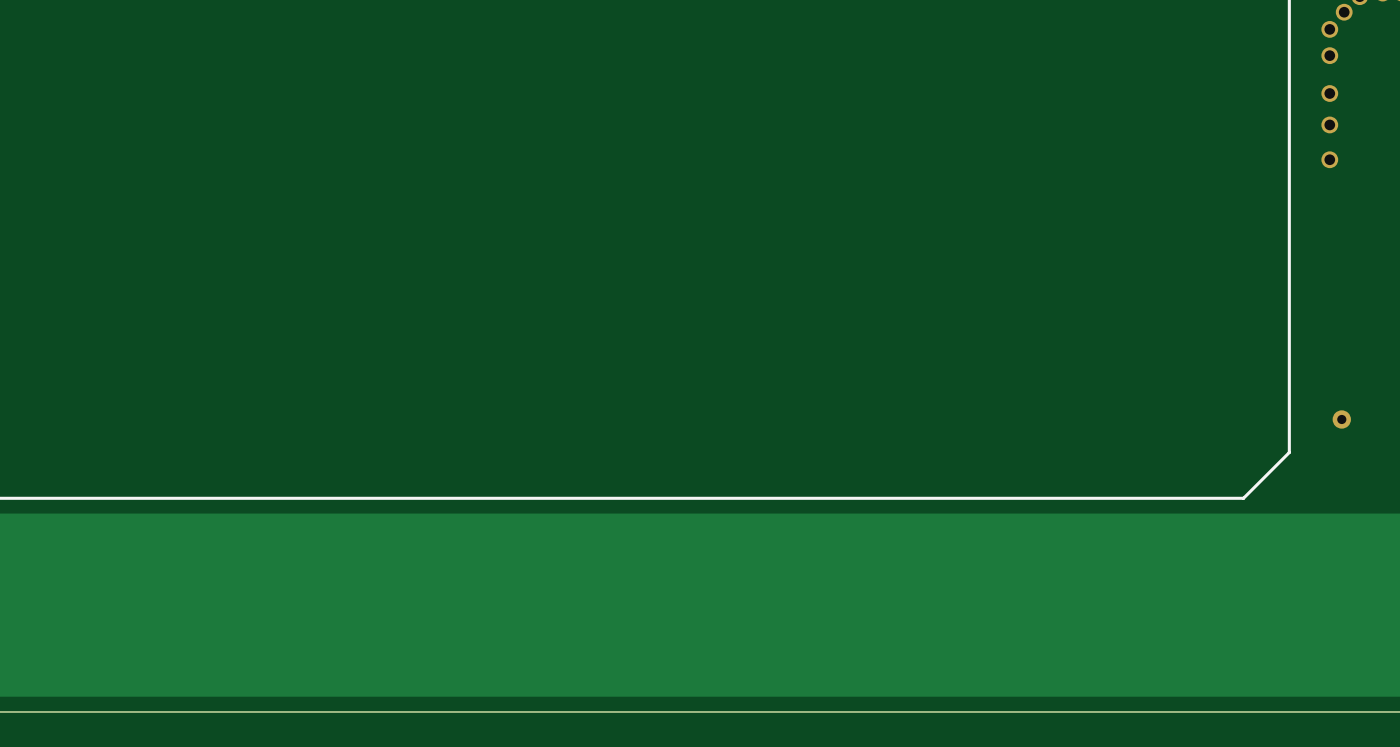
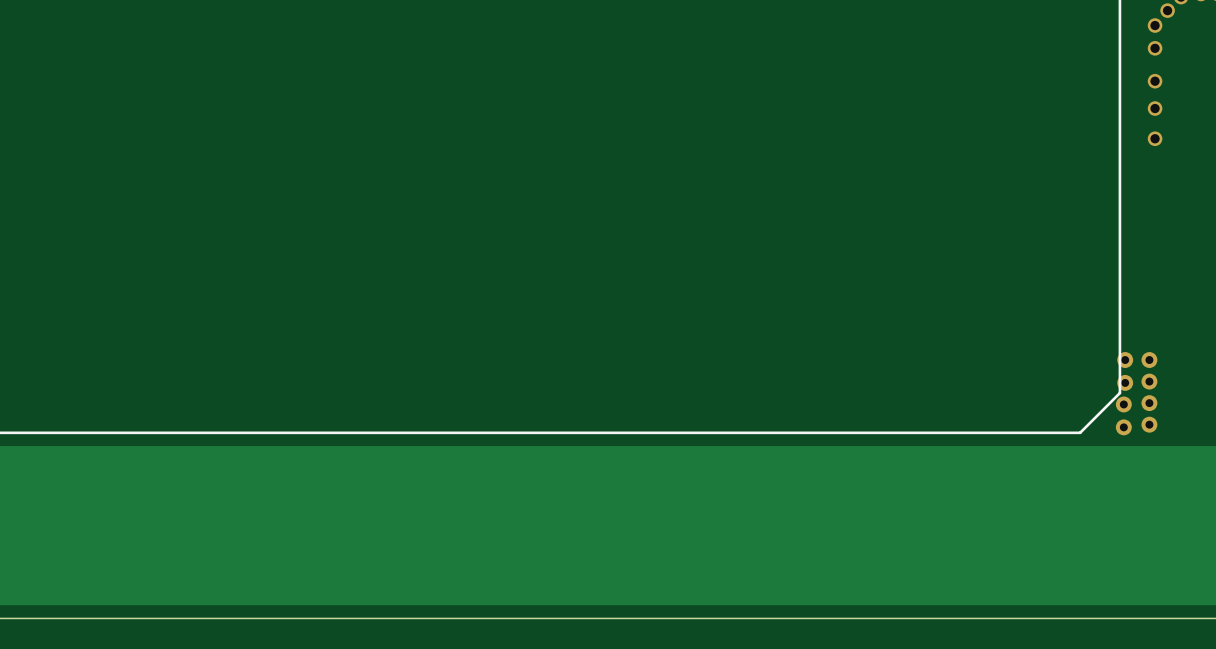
via: none -> (1125, 360)
via: none -> (1149, 360)
via: (1341, 419) -> none
via: none -> (1149, 381)
via: none -> (1125, 382)
via: none -> (1149, 403)
via: none -> (1123, 404)
via: none -> (1149, 424)
via: none -> (1123, 427)

